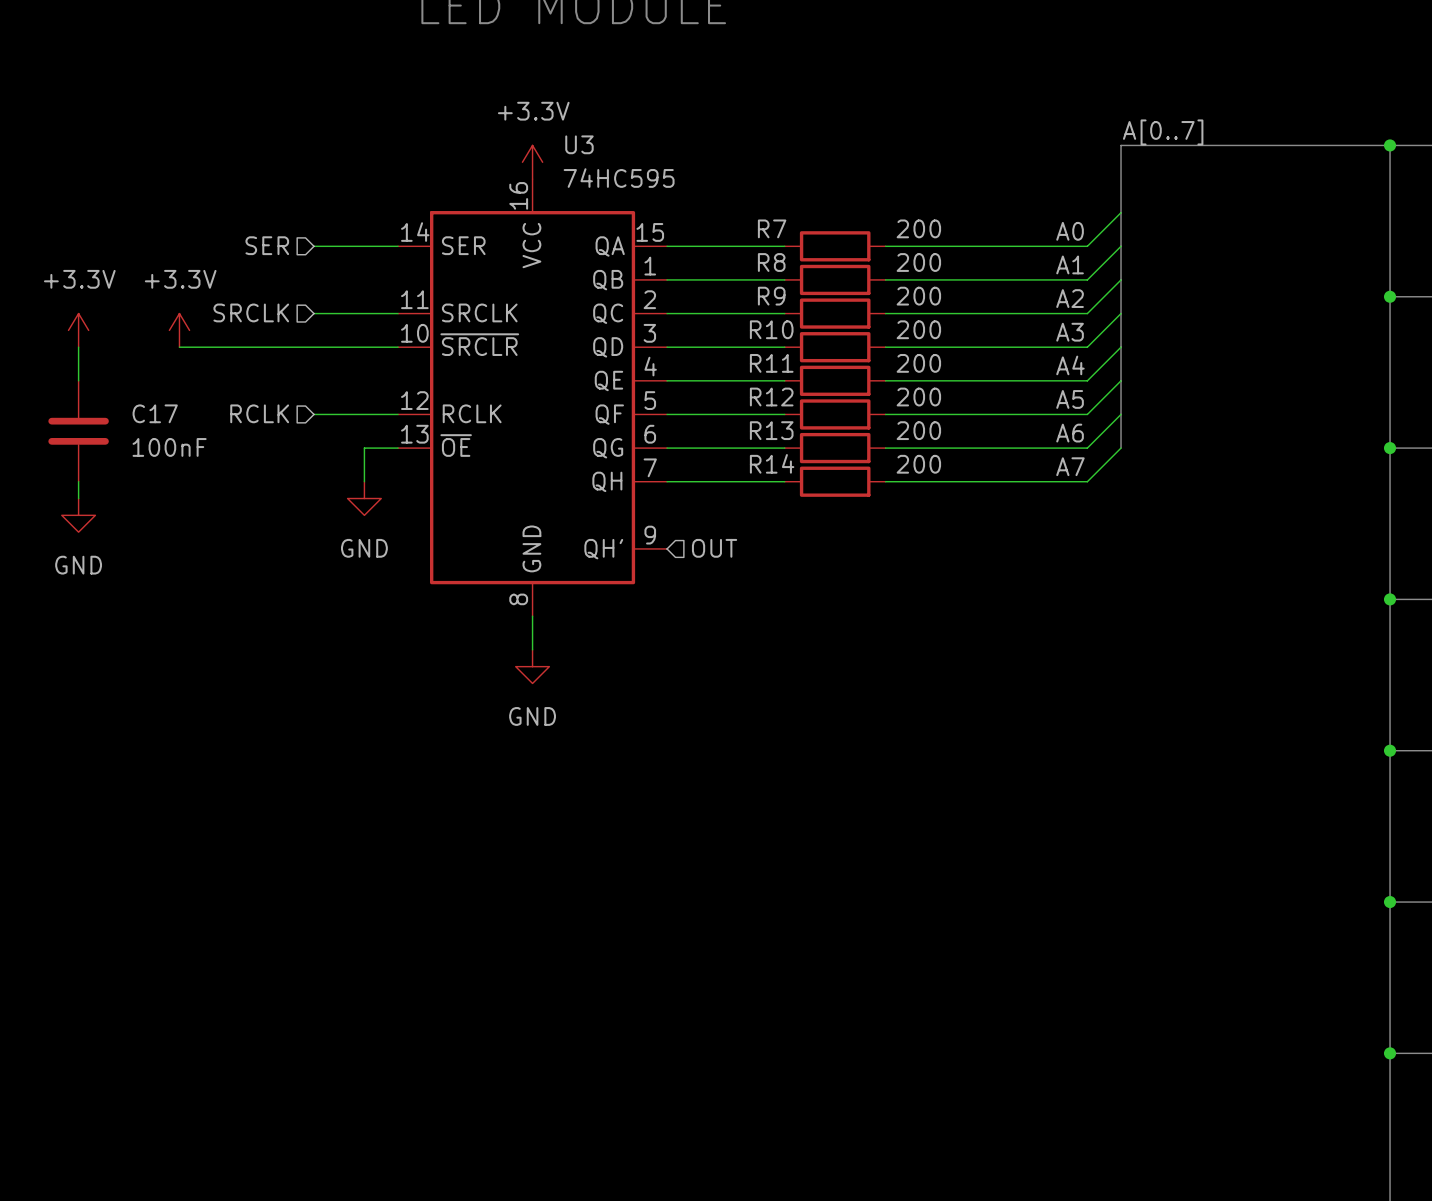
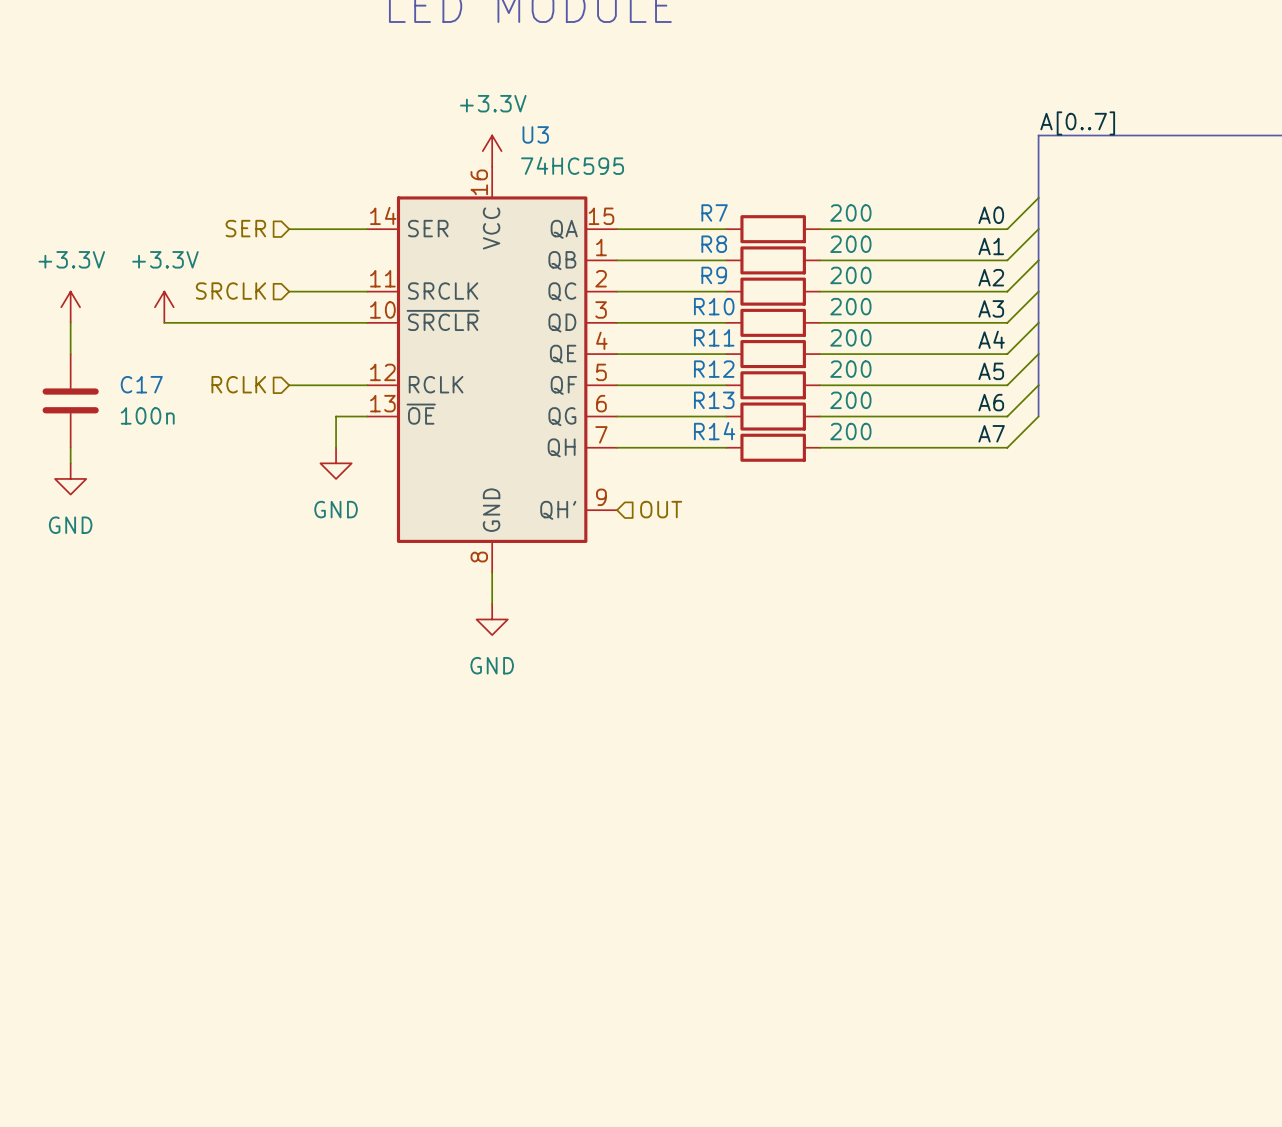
C17 value: 100nF (169, 447) -> 100n (147, 415)

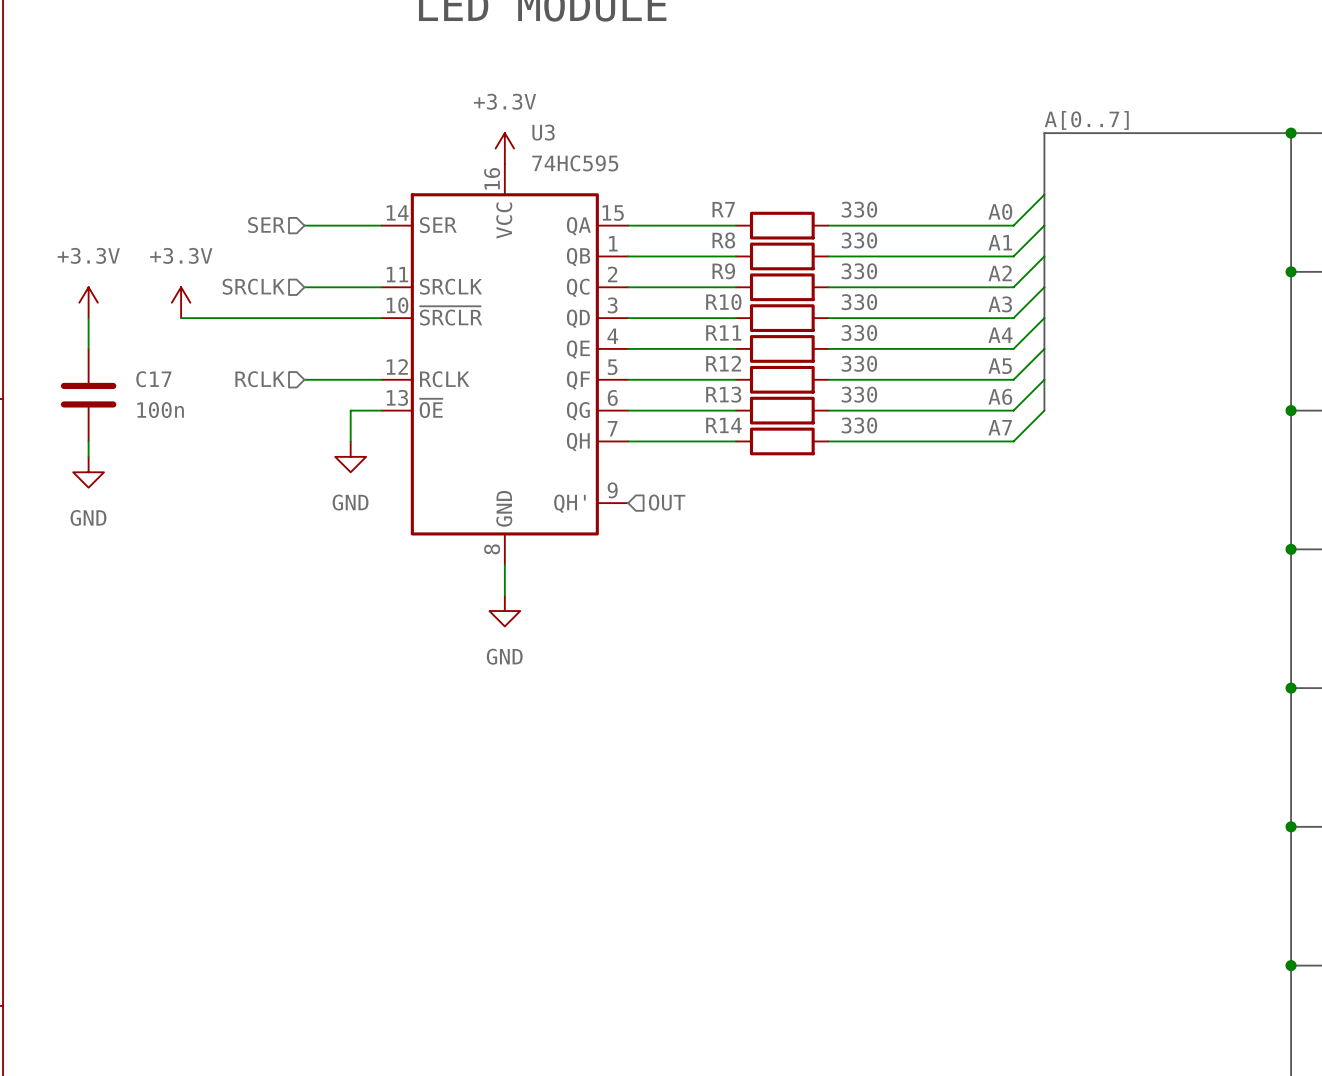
R7 value: 200 (850, 212) -> 330 (859, 209)
R8 value: 200 (850, 244) -> 330 (859, 240)
R9 value: 200 (850, 275) -> 330 (859, 271)
R10 value: 200 (850, 306) -> 330 (859, 302)
R11 value: 200 (850, 337) -> 330 (859, 332)
R12 value: 200 (850, 369) -> 330 (859, 363)
R13 value: 200 (850, 400) -> 330 (859, 394)
R14 value: 200 (850, 431) -> 330 (859, 425)

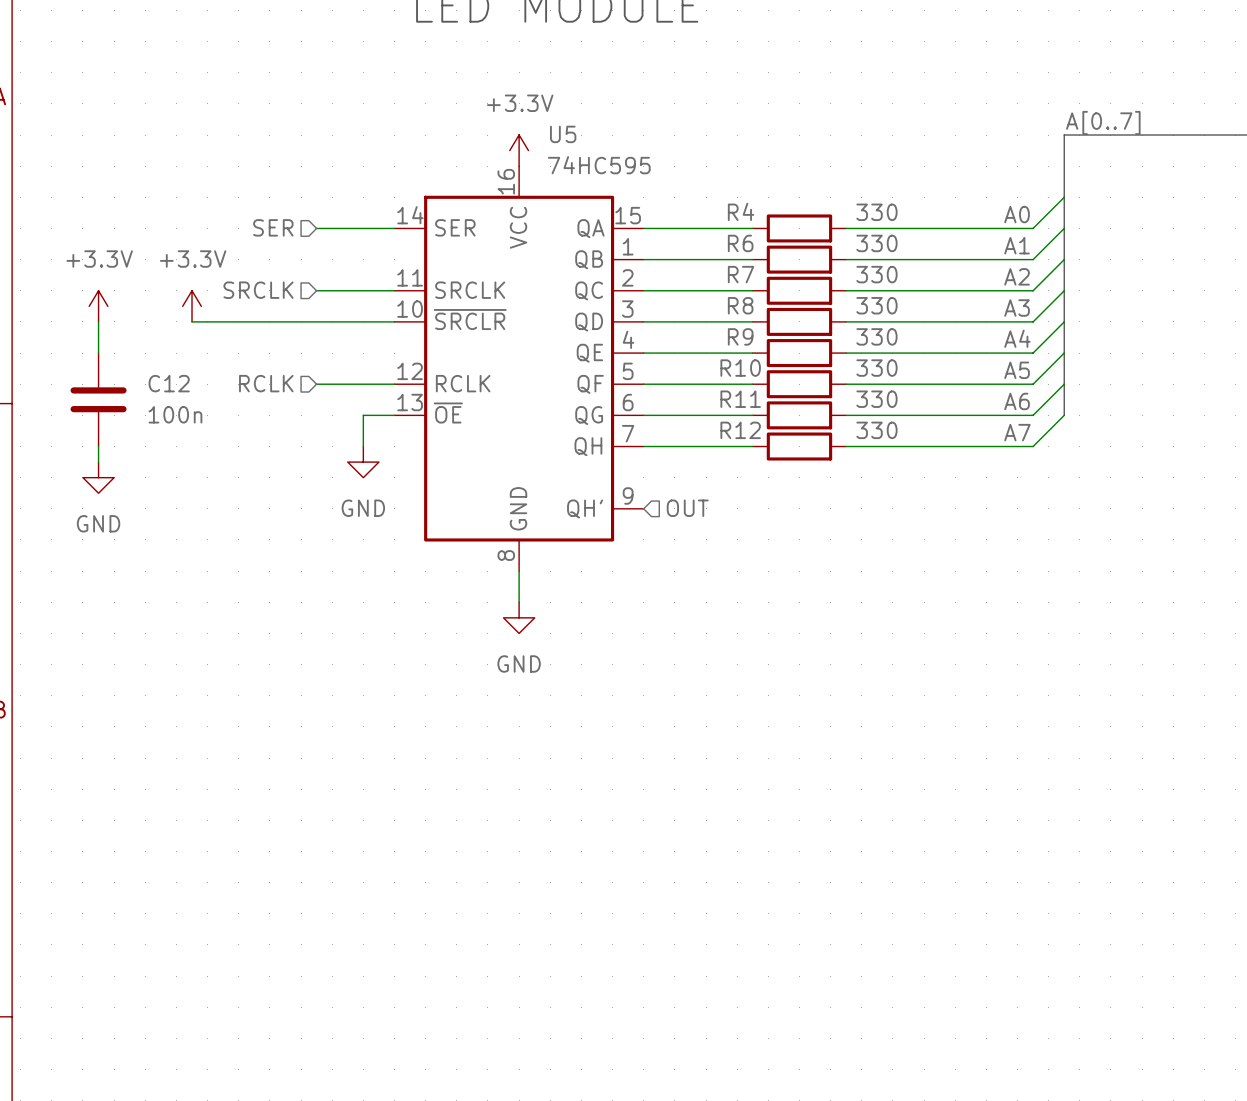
U3 name: U3 (543, 132) -> U5 (563, 134)
R7 name: R7 (723, 209) -> R4 (741, 211)
R8 name: R8 (723, 240) -> R6 (740, 243)
R9 name: R9 (723, 271) -> R7 (741, 274)
R10 name: R10 (723, 302) -> R8 (740, 305)
R11 name: R11 (723, 332) -> R9 (740, 336)
R12 name: R12 (723, 363) -> R10 (740, 368)
C17 name: C17 (153, 379) -> C12 (169, 383)
R13 name: R13 (723, 394) -> R11 (740, 399)
R14 name: R14 (723, 425) -> R12 (740, 430)

